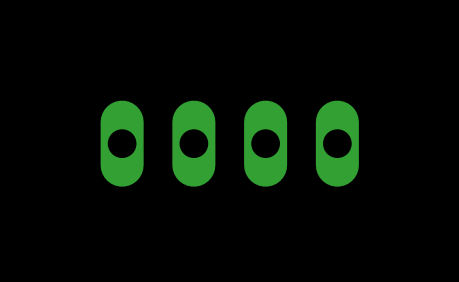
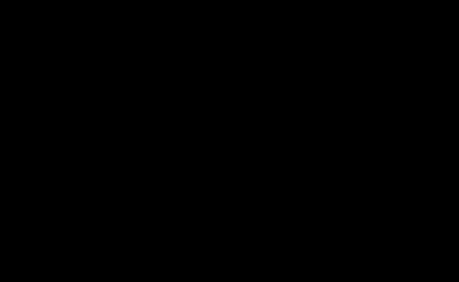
part: (229, 143) -> none

